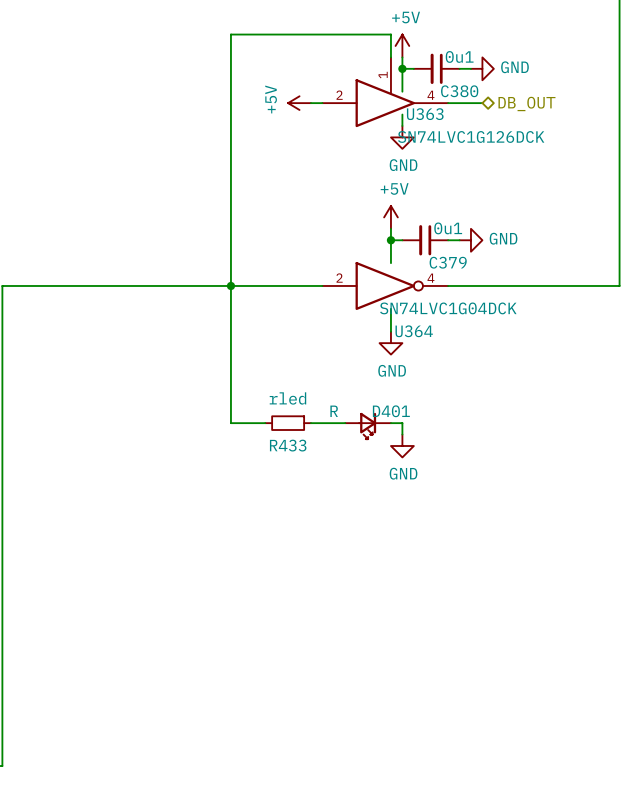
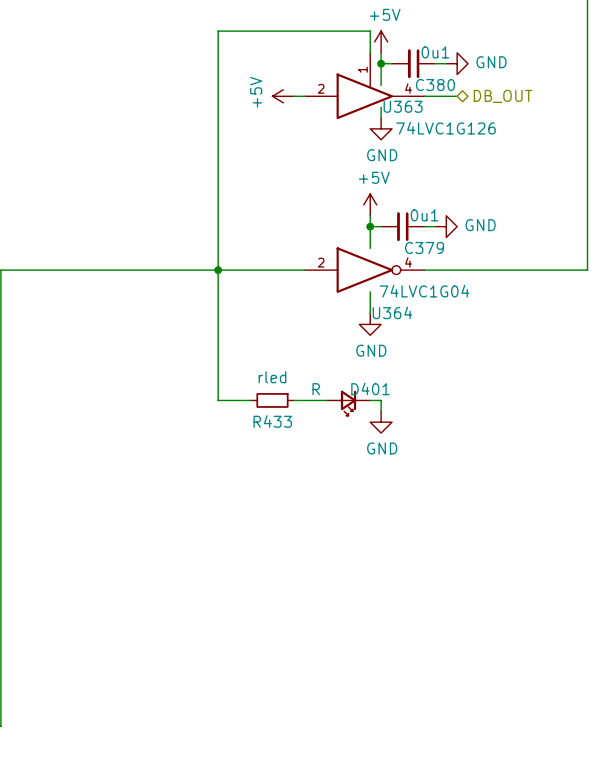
U363 value: SN74LVC1G126DCK (471, 136) -> 74LVC1G126 (446, 128)
U364 value: SN74LVC1G04DCK (448, 308) -> 74LVC1G04 (424, 291)

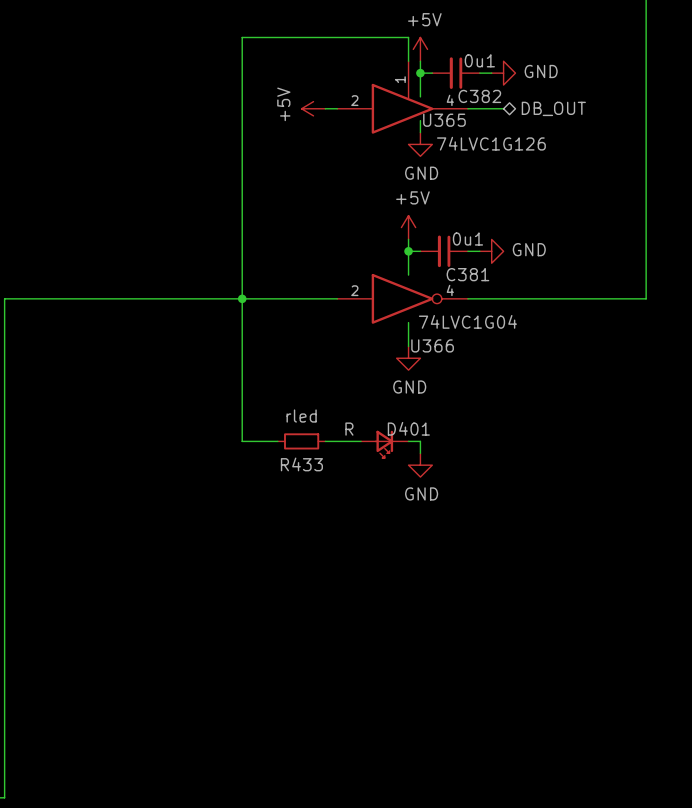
C380 name: C380 (435, 85) -> C382 (479, 96)
U363 name: U363 (403, 106) -> U365 (444, 120)
C379 name: C379 (424, 247) -> C381 (467, 274)
U364 name: U364 (392, 312) -> U366 (432, 345)

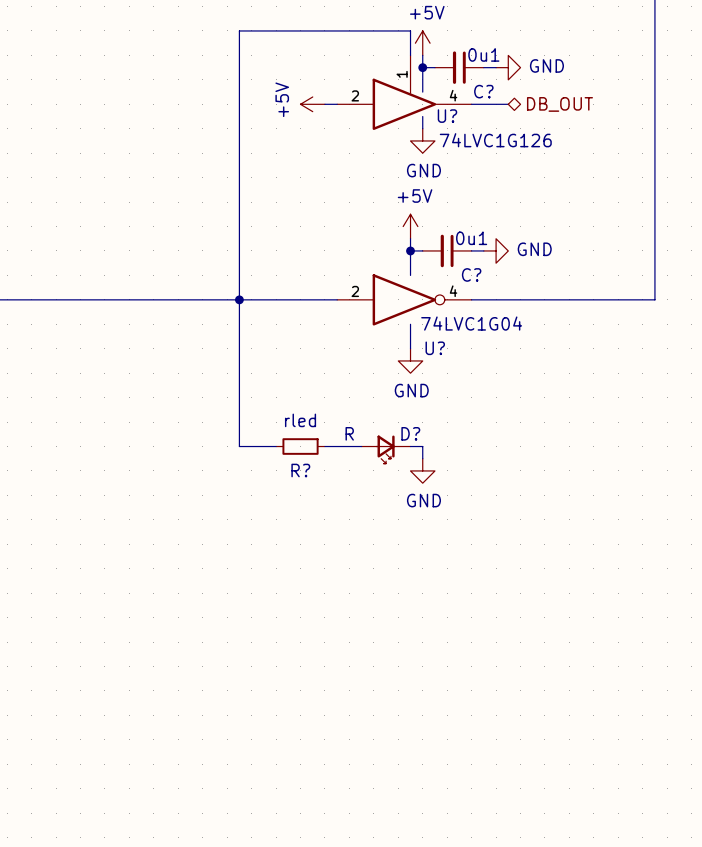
C382 name: C382 (479, 96) -> C? (483, 91)
U365 name: U365 (444, 120) -> U? (447, 116)
C381 name: C381 (467, 274) -> C? (471, 274)
U366 name: U366 (432, 345) -> U? (435, 348)
D401 name: D401 (408, 428) -> D? (410, 433)
R433 name: R433 (301, 464) -> R? (300, 470)

